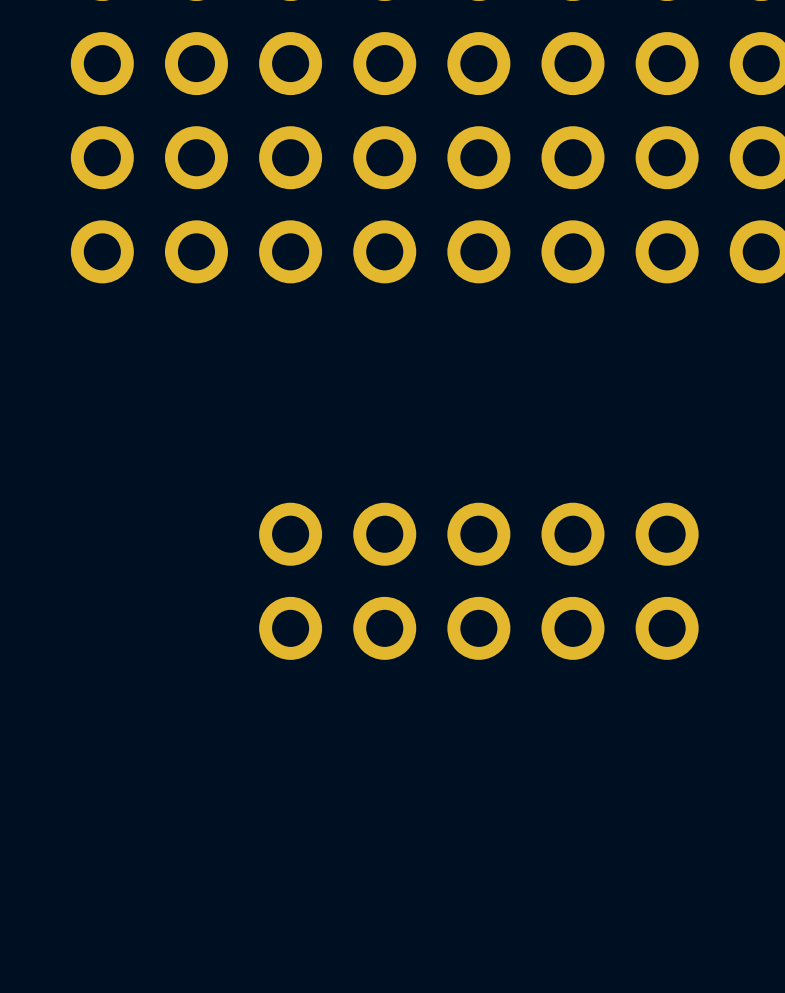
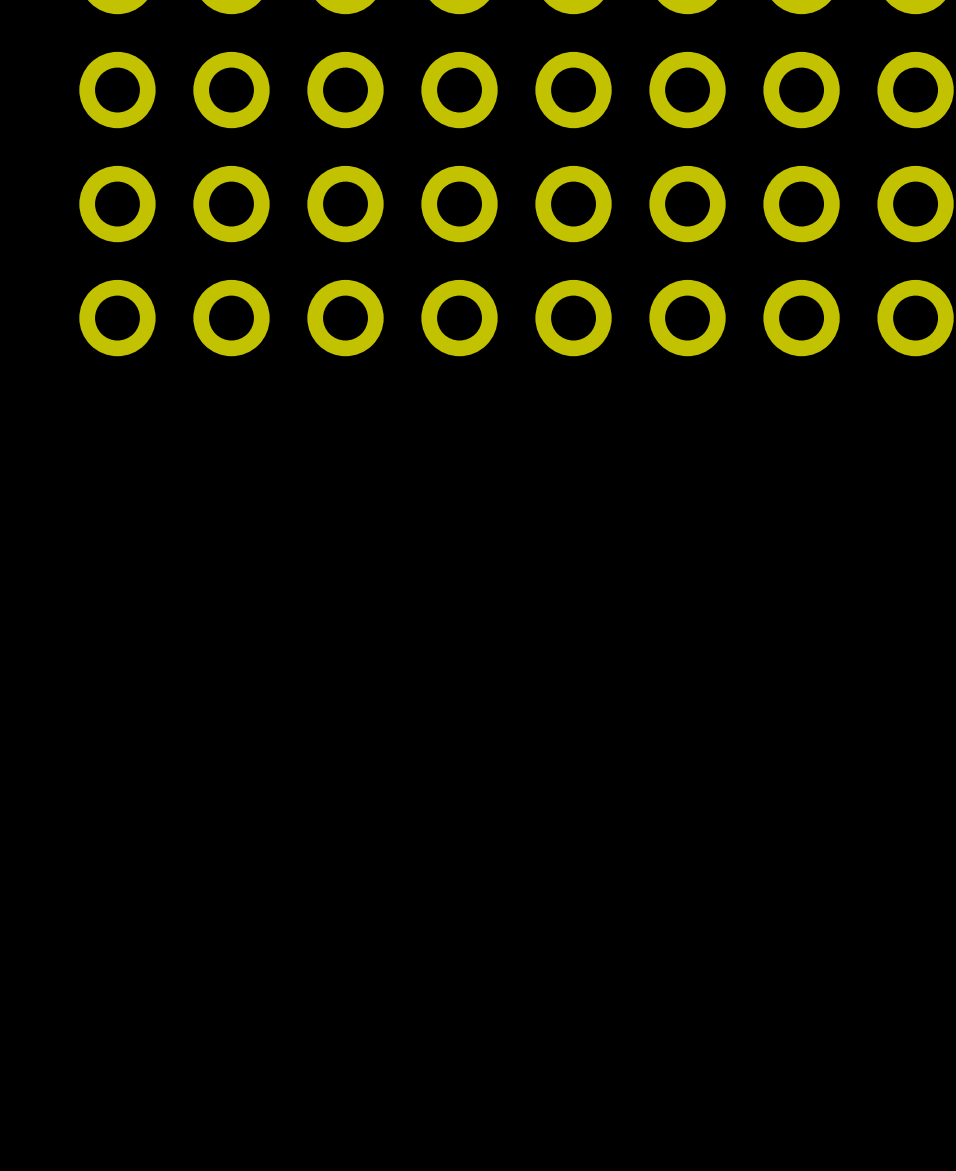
part: (290, 534) -> none
part: (384, 534) -> none
part: (478, 534) -> none
part: (573, 534) -> none
part: (667, 534) -> none
part: (290, 628) -> none
part: (384, 628) -> none
part: (478, 628) -> none
part: (573, 628) -> none
part: (667, 628) -> none

